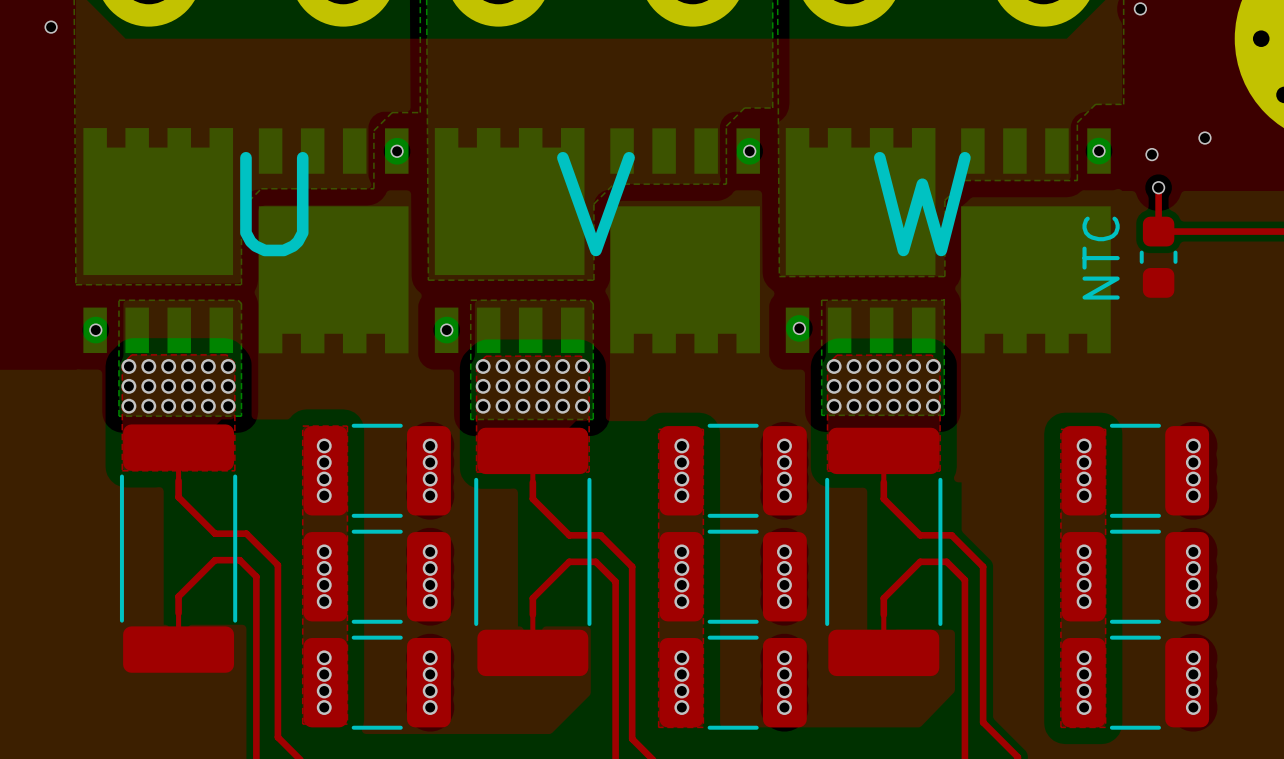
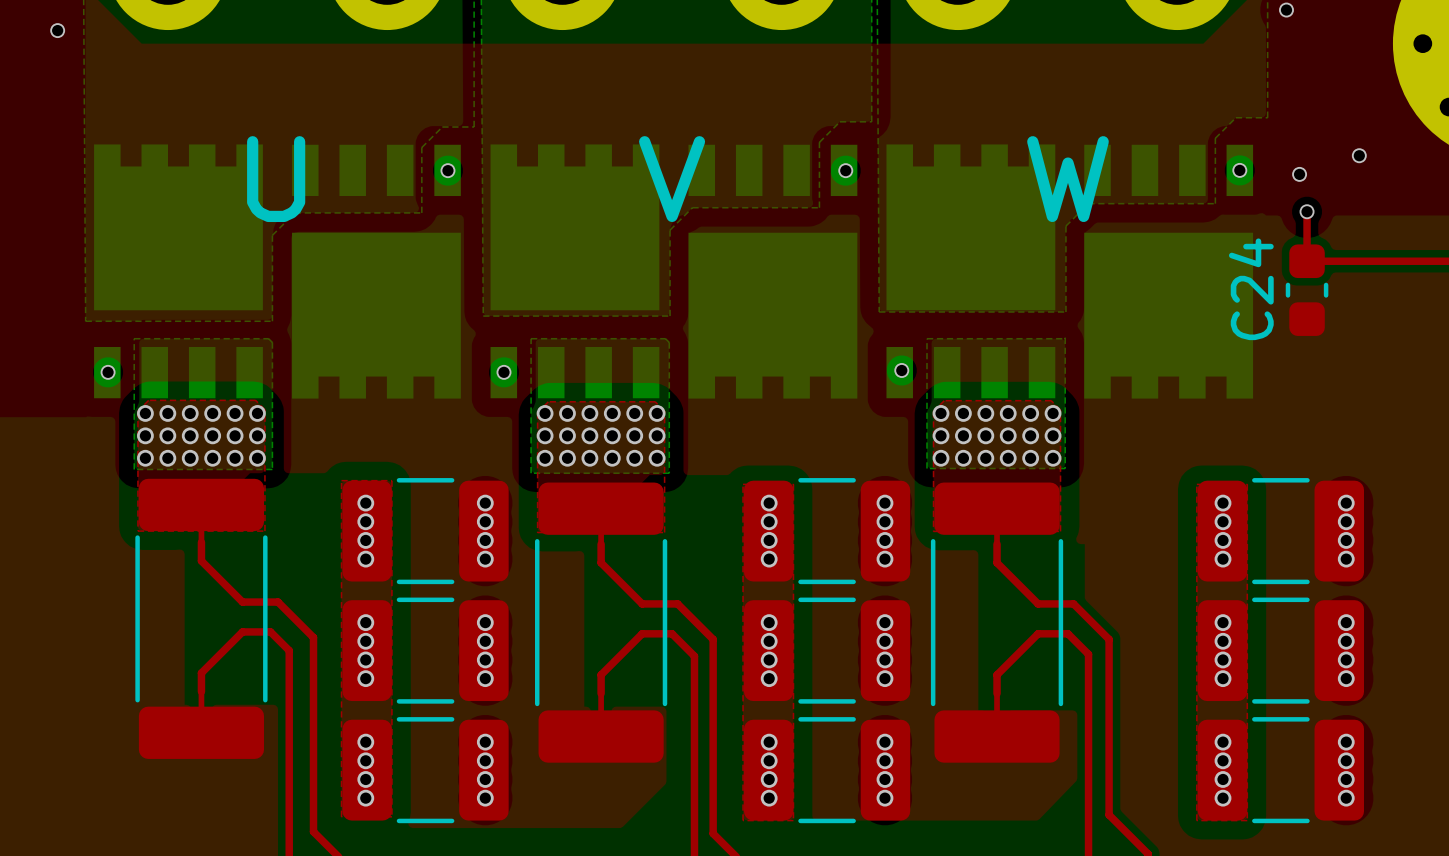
text: none -> U (276, 179)
V name: none -> V (672, 179)
text: none -> W (1067, 179)
text: U V W (605, 204) -> none
C24 name: none -> C24 (1251, 289)
text: NTC (1101, 258) -> none

